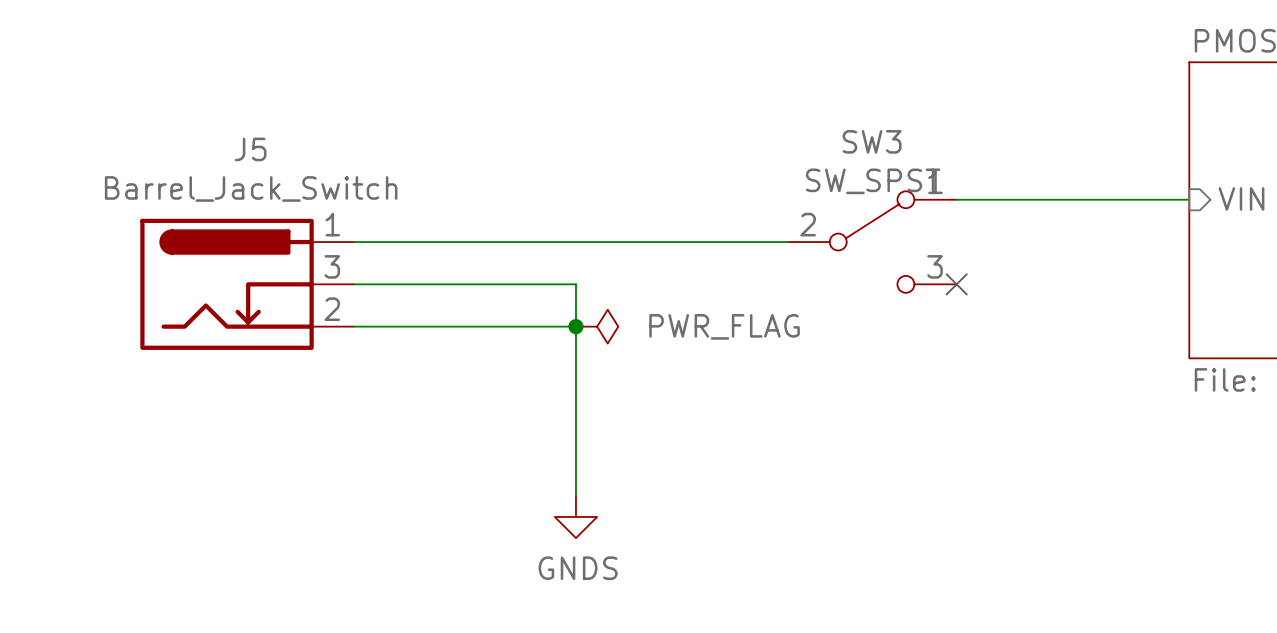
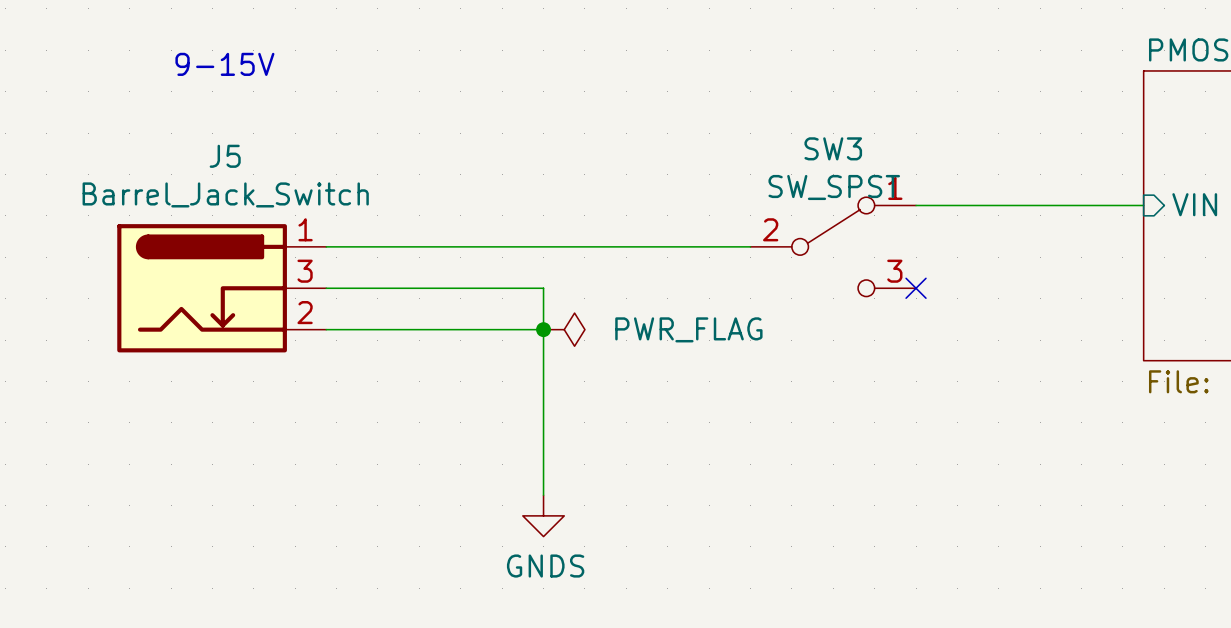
text: none -> 9-15V (224, 64)

